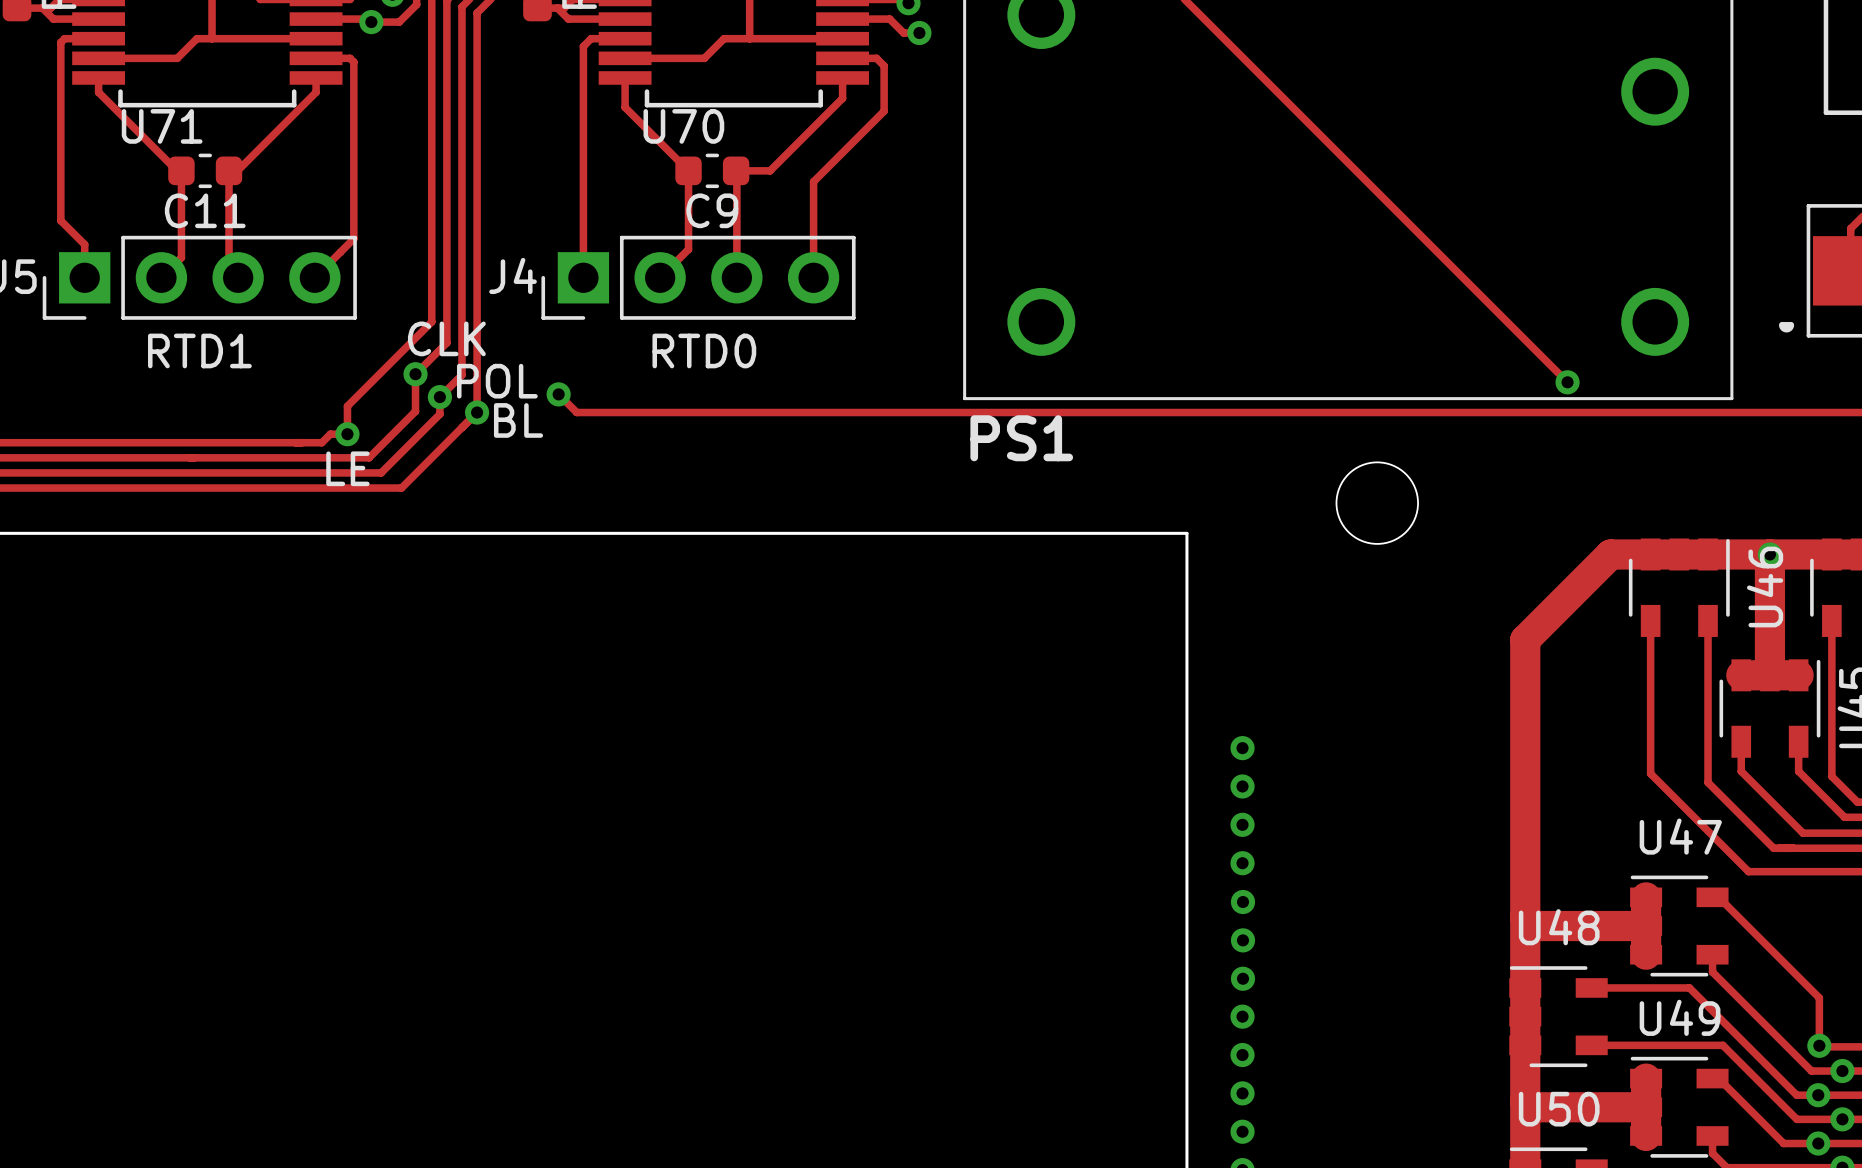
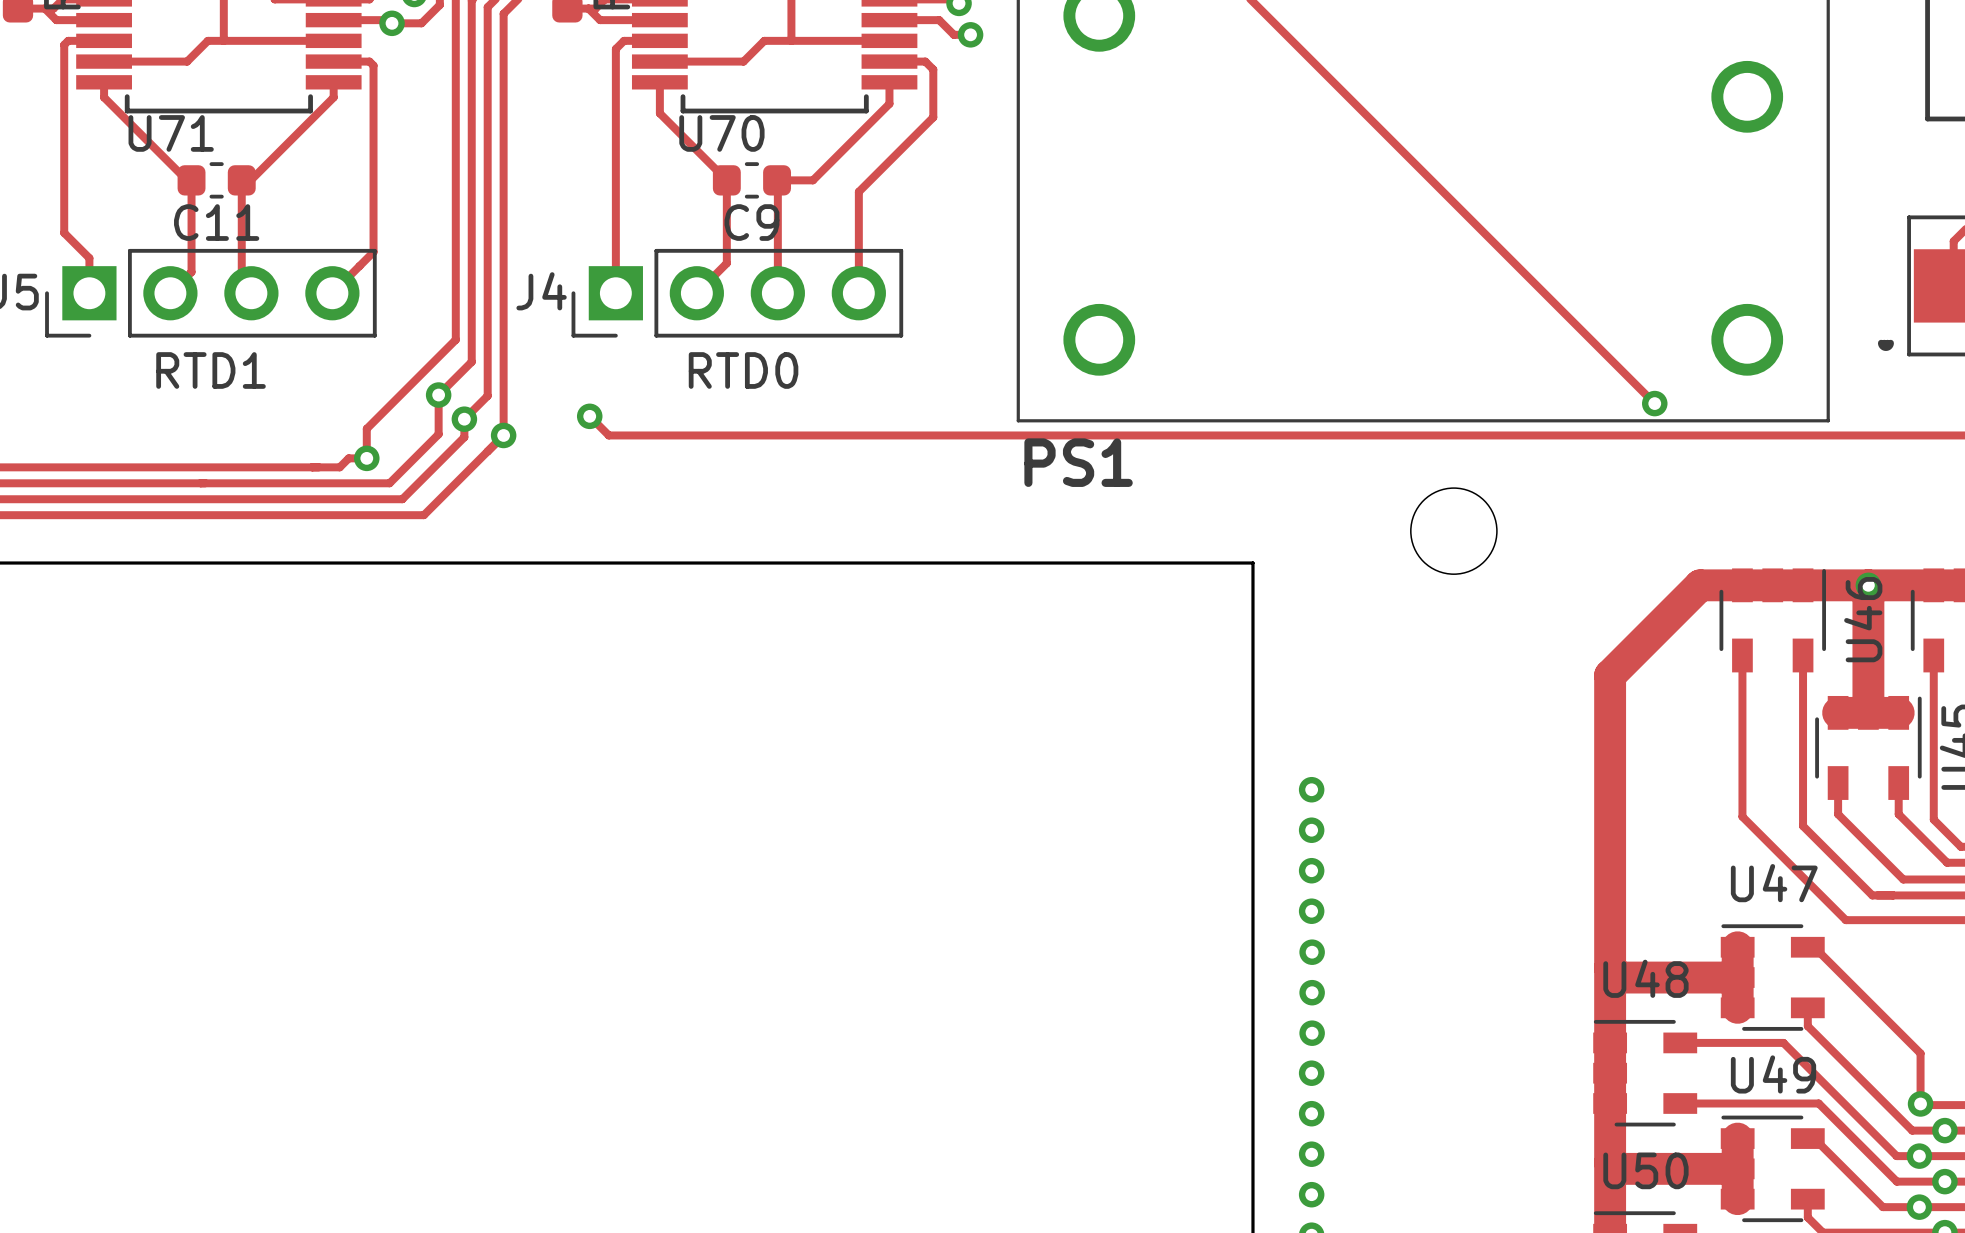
text: CLK (446, 338) -> none
text: POL (497, 381) -> none
text: BL (518, 420) -> none
text: LE (347, 468) -> none

